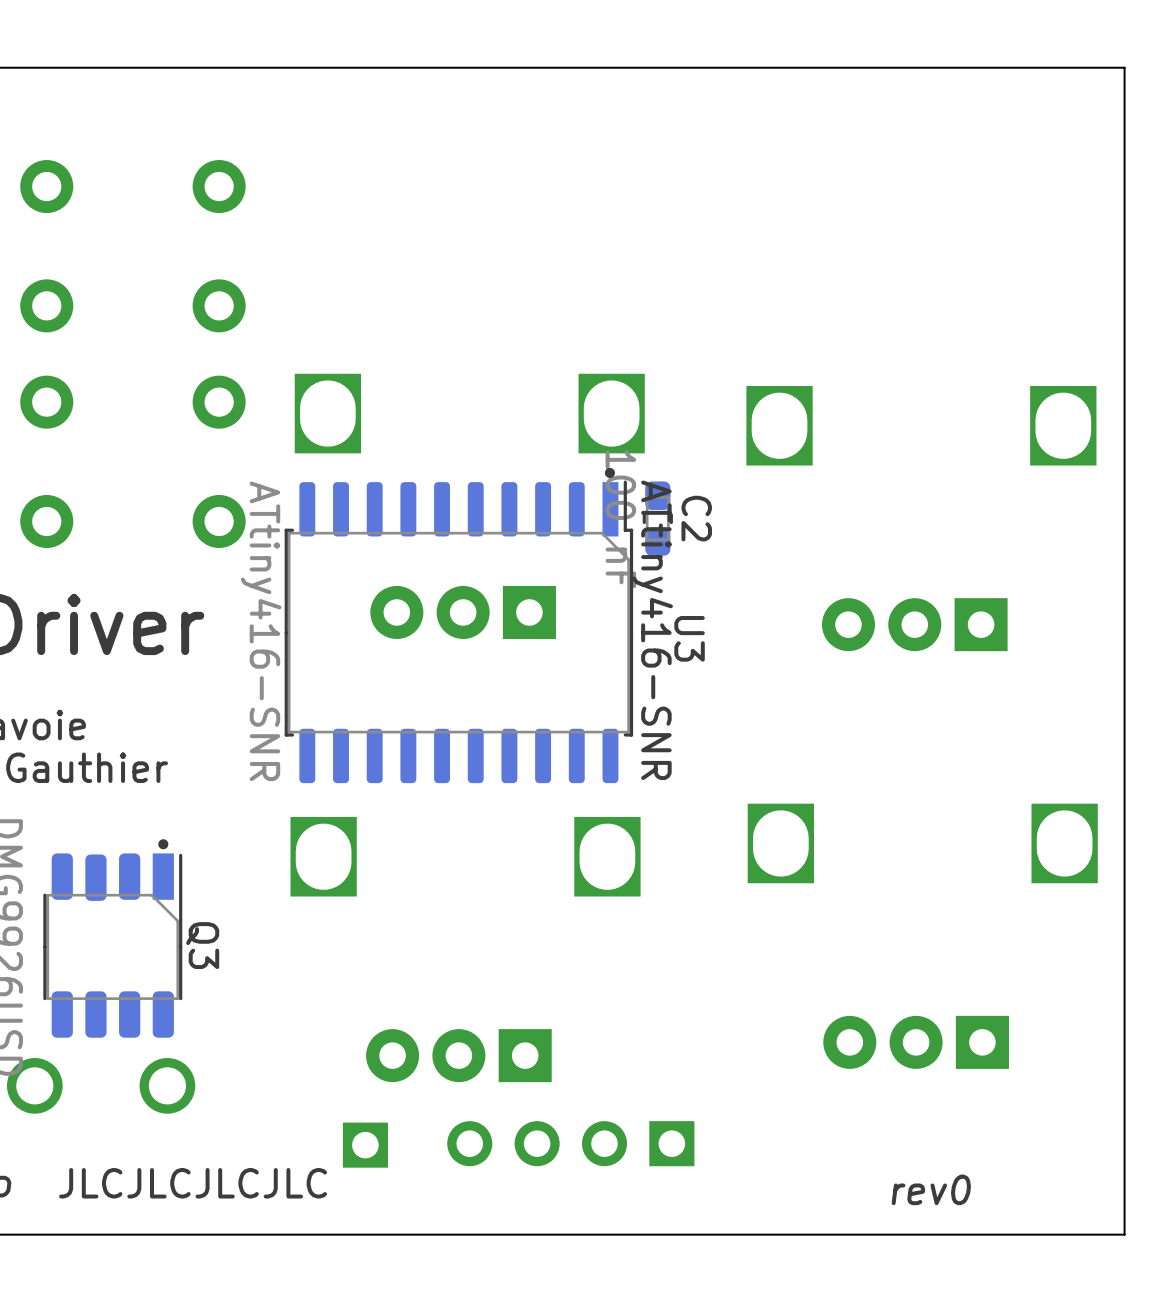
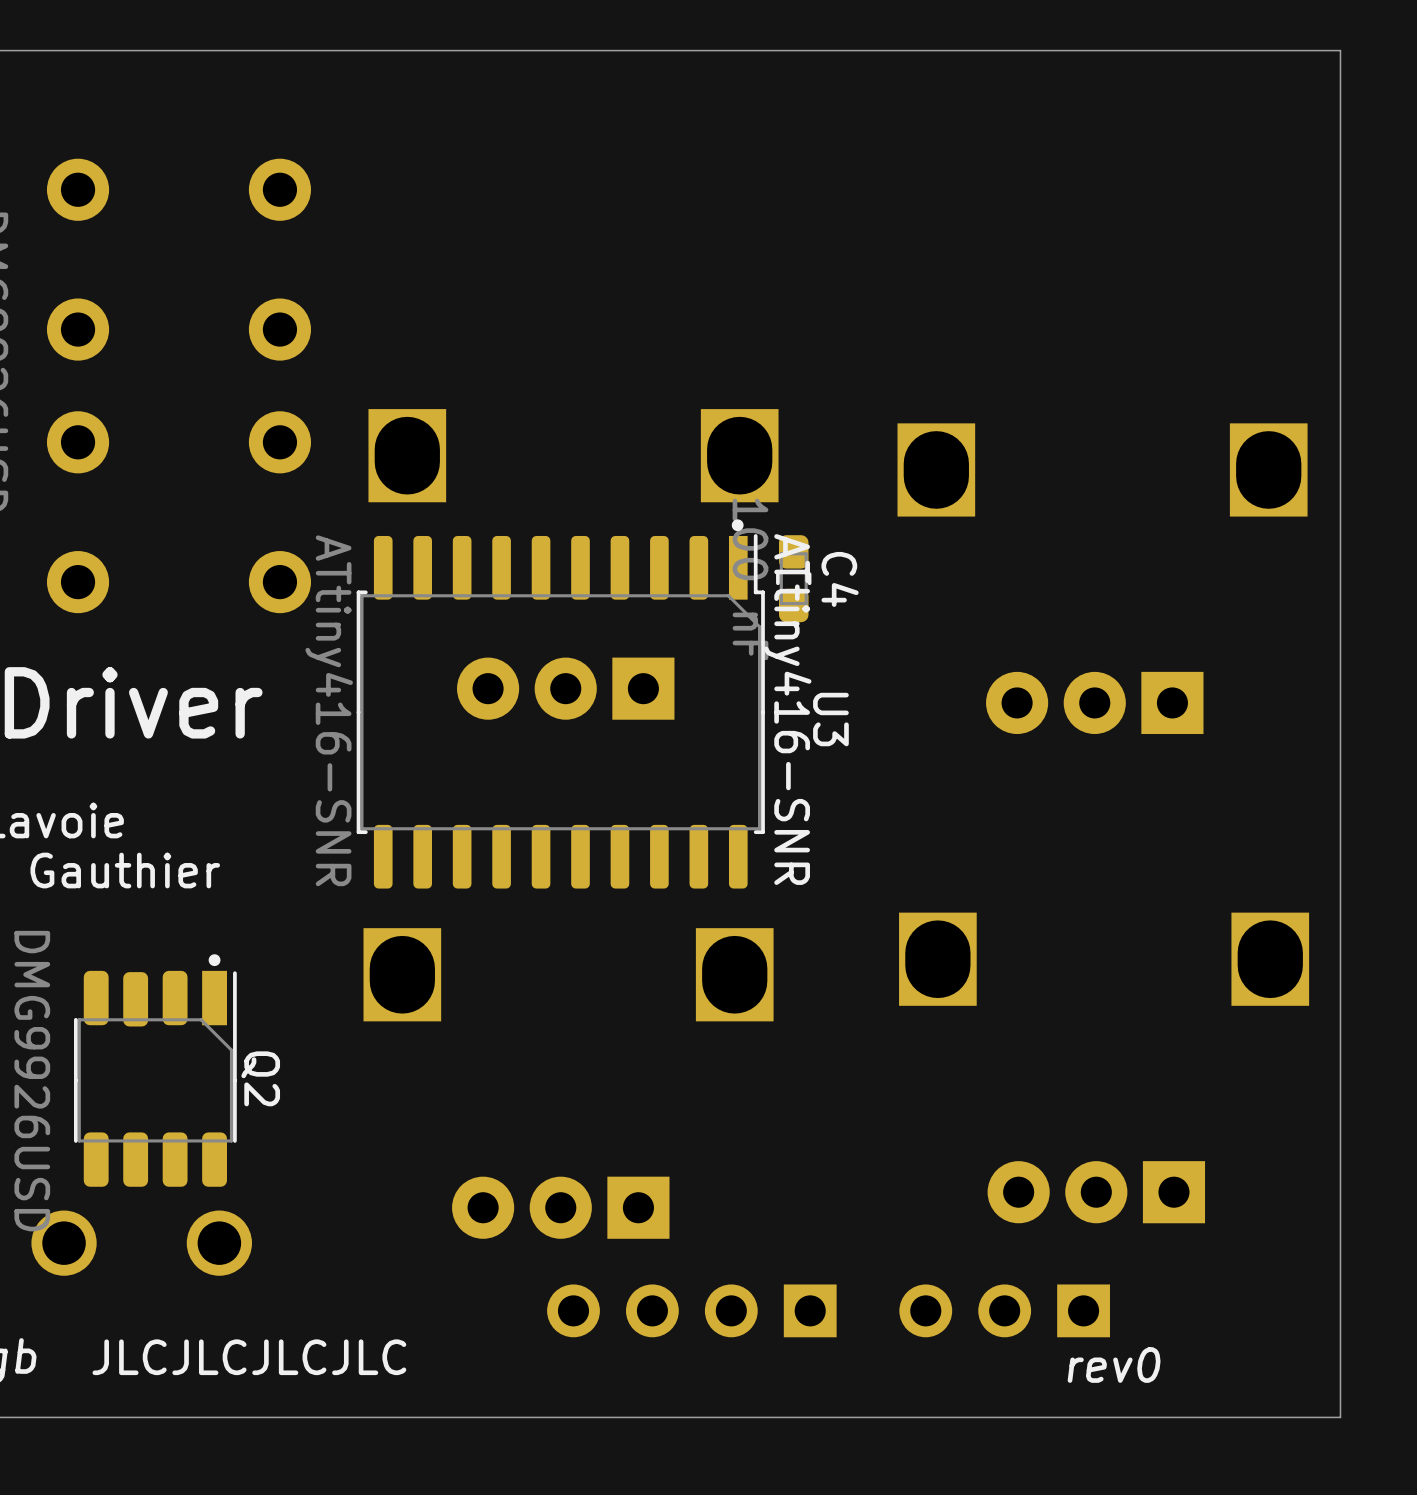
C2 name: C2 (696, 518) -> C4 (840, 579)
Q3 name: Q3 (202, 945) -> Q2 (260, 1078)
part: none -> (1004, 1310)
part: (365, 1145) -> none

